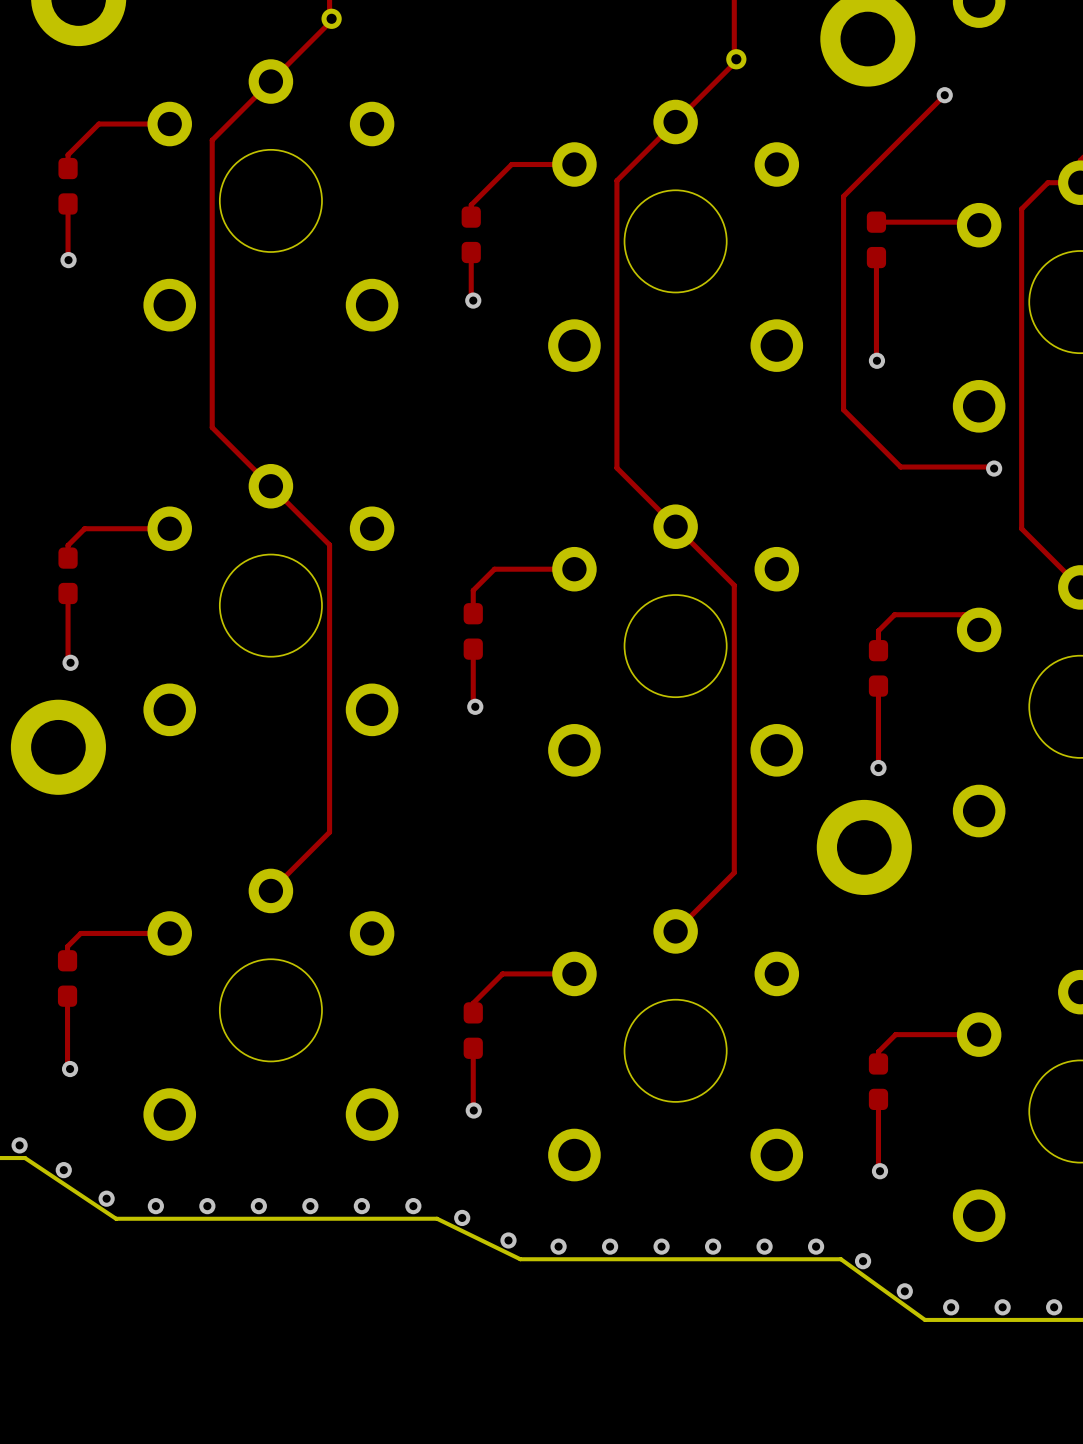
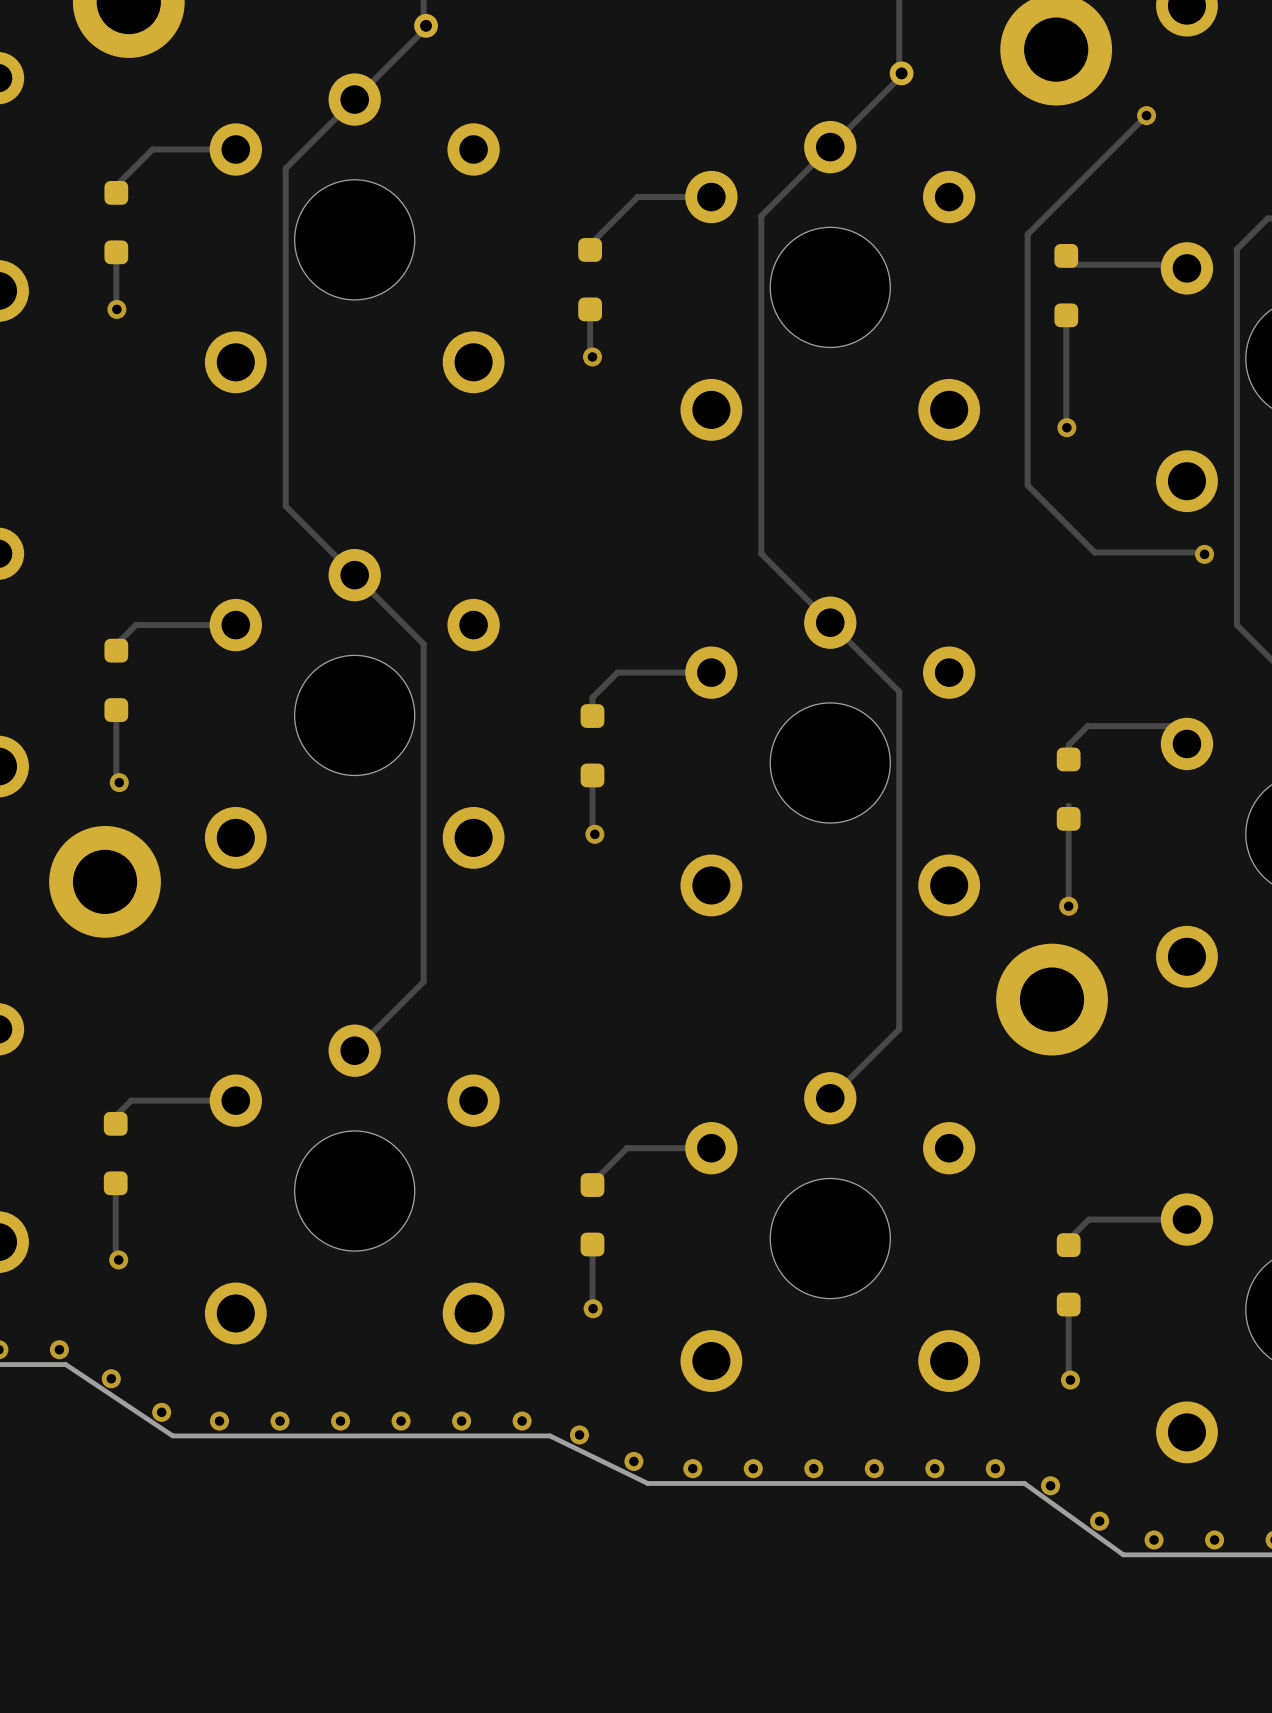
part footprint: [58, 157, 78, 215] -> [104, 180, 129, 265]
part footprint: [461, 206, 481, 264] -> [578, 238, 603, 322]
part footprint: [866, 211, 887, 269] -> [1054, 244, 1079, 328]
part footprint: [58, 547, 78, 605] -> [104, 638, 129, 722]
part footprint: [463, 603, 483, 660] -> [580, 704, 605, 788]
part footprint: [868, 640, 889, 697] -> [1056, 747, 1081, 831]
part footprint: [57, 950, 78, 1007] -> [103, 1111, 128, 1196]
part footprint: [463, 1002, 483, 1059] -> [580, 1173, 605, 1257]
part footprint: [868, 1053, 889, 1111] -> [1056, 1233, 1081, 1317]

